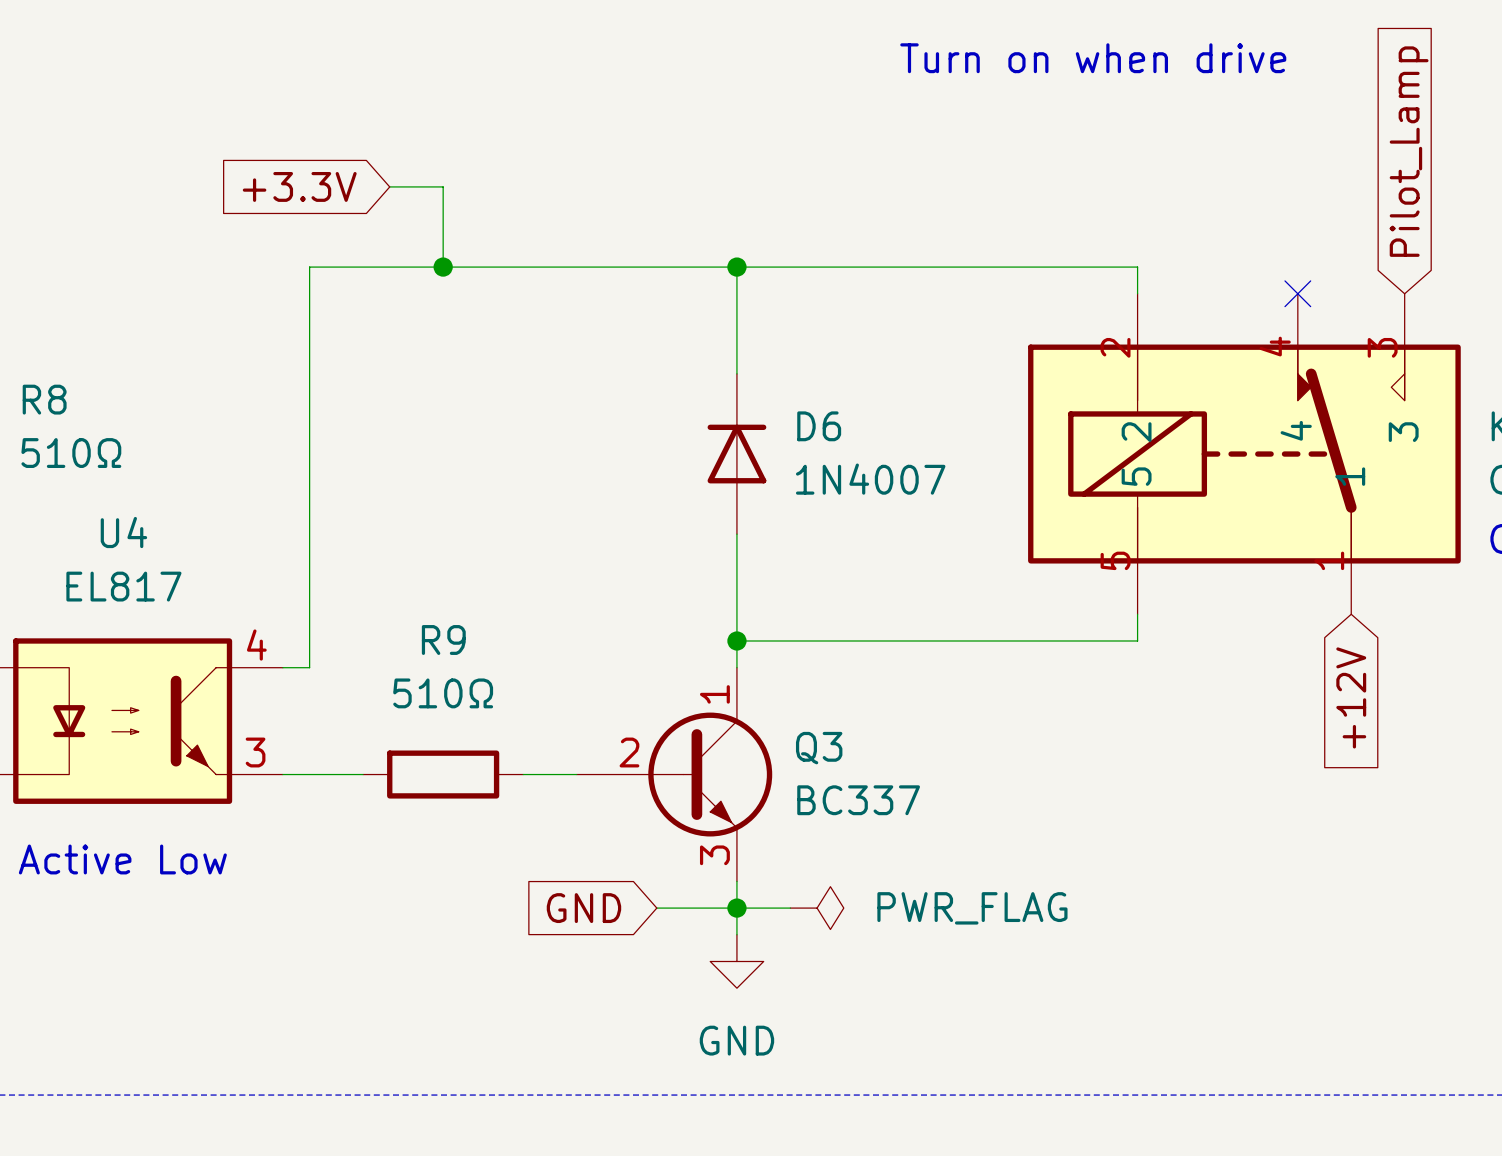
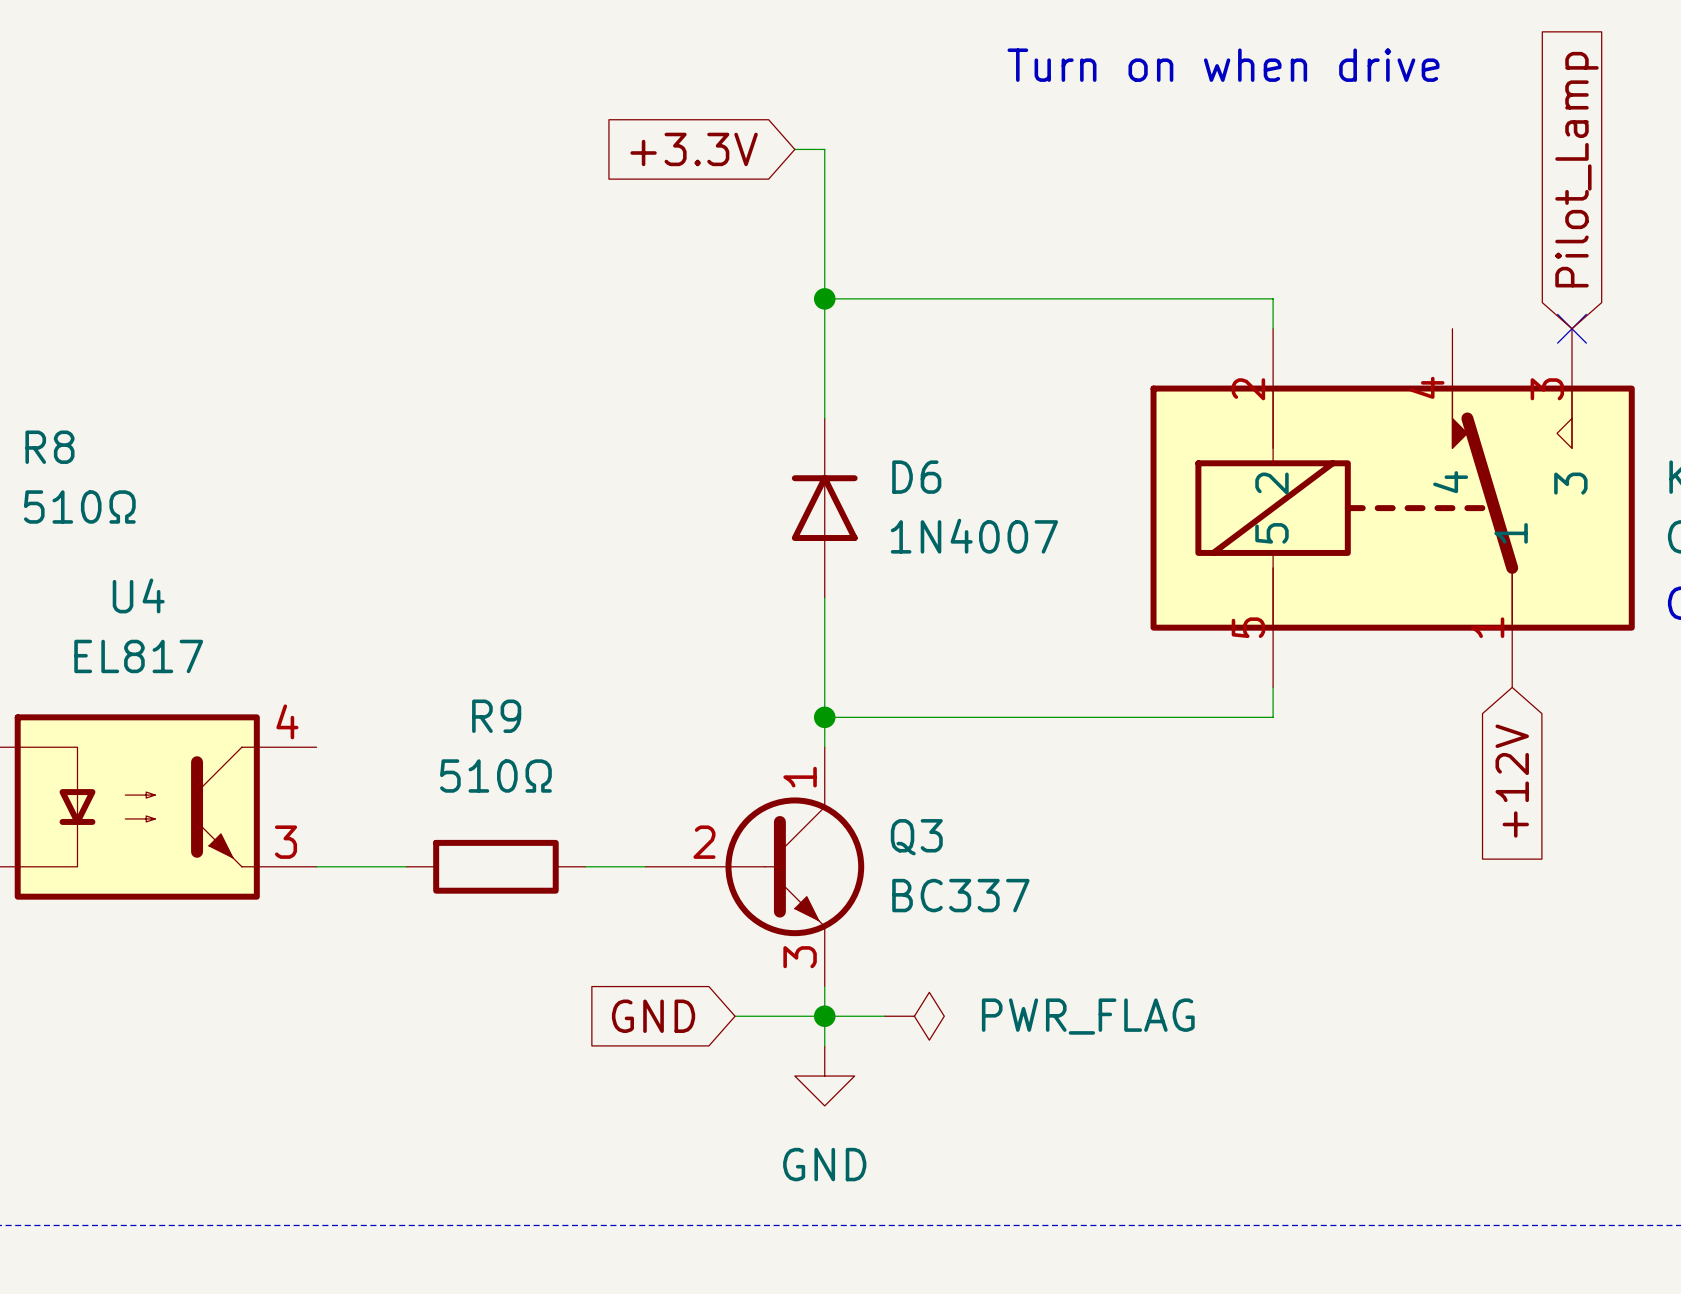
global label position: +3.3V (299, 186) -> +3.3V (694, 149)
wire: (389, 186) (443, 186) (443, 267) -> none
junction: (443, 267) -> none
wire: (736, 267) (309, 267) (309, 667) (282, 667) -> (824, 298) (824, 149) (794, 149)
no-connect mark position: (1297, 293) -> (1571, 328)
text: Active Low (122, 859) -> none

